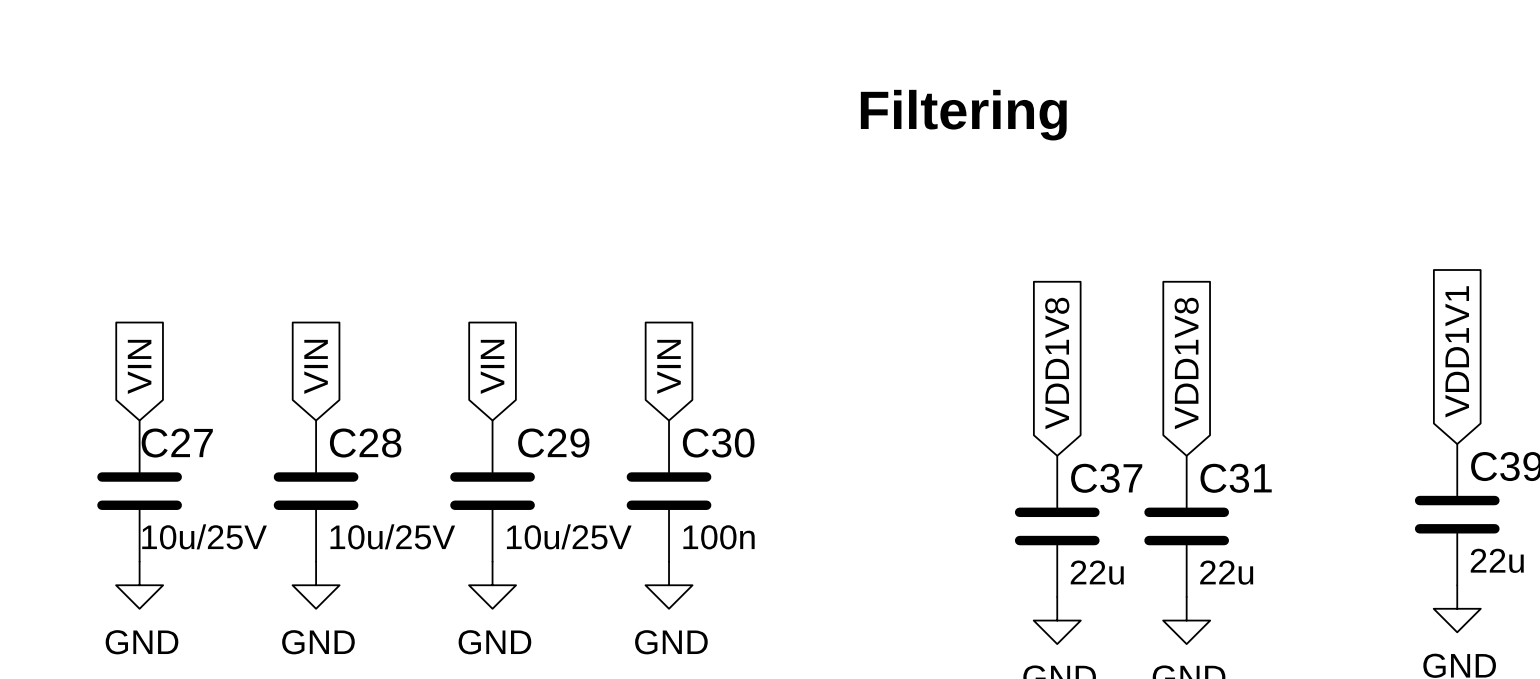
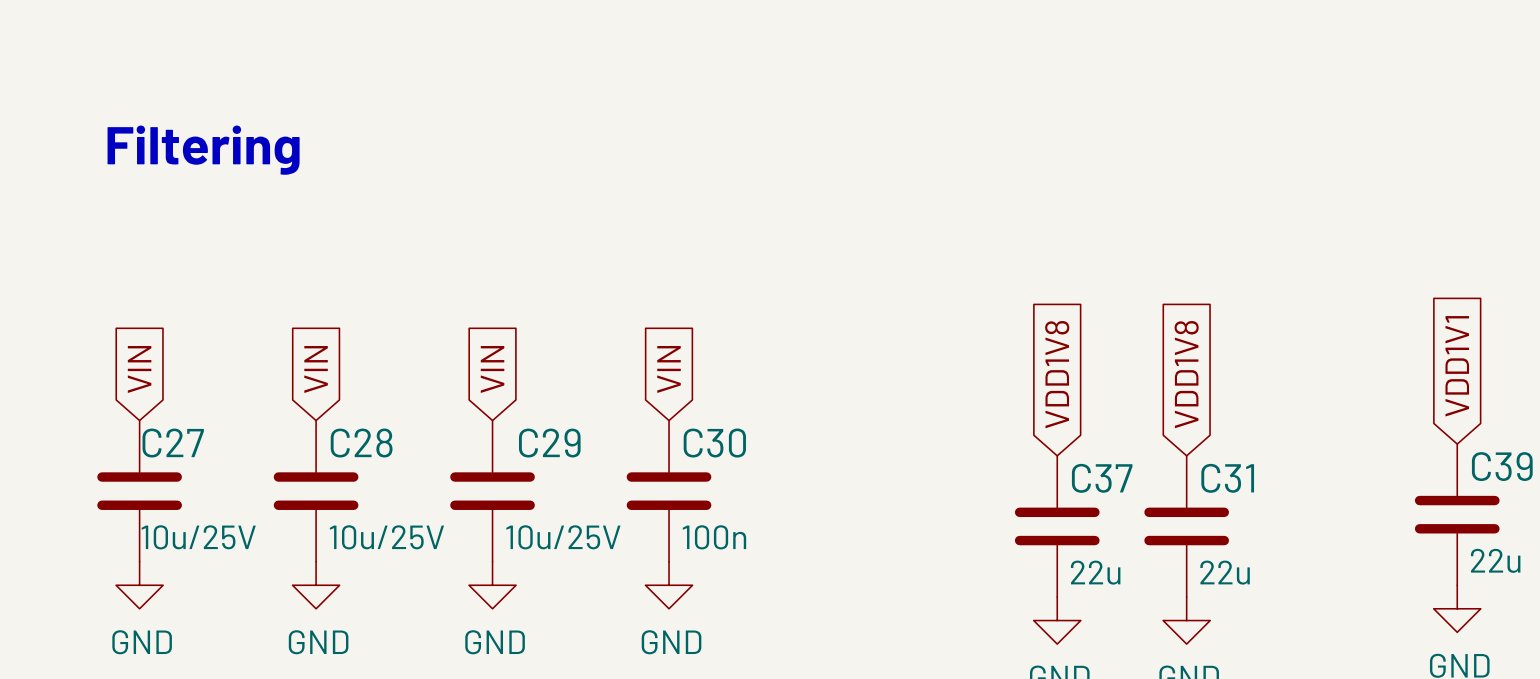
text: Filtering (963, 115) -> none
text: none -> Filtering (203, 150)

